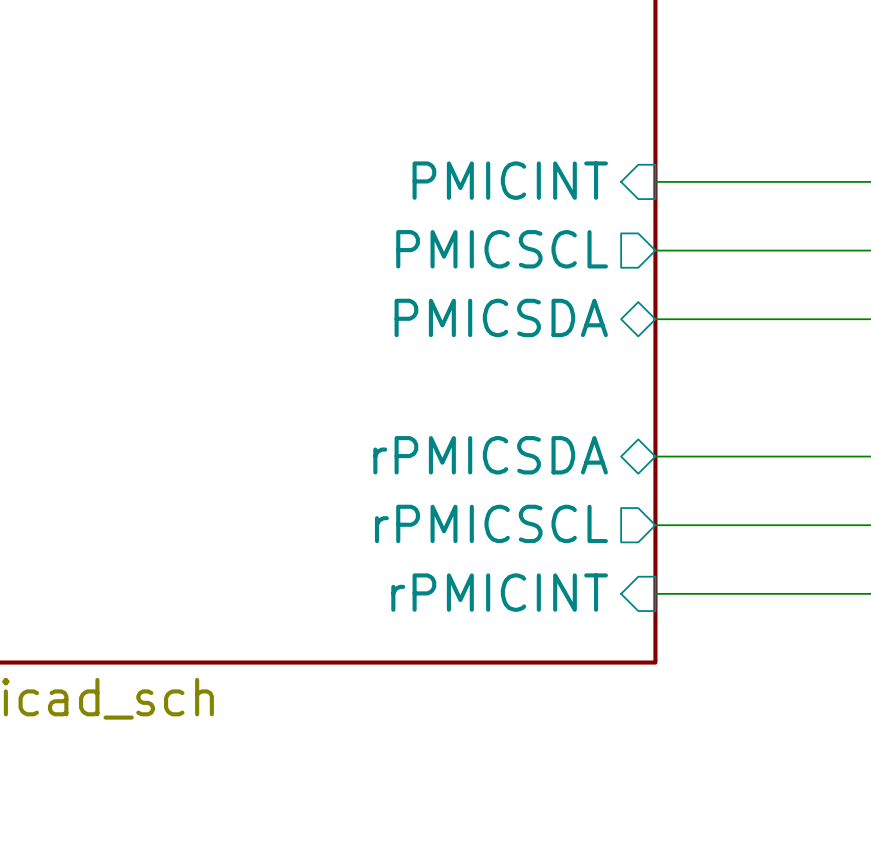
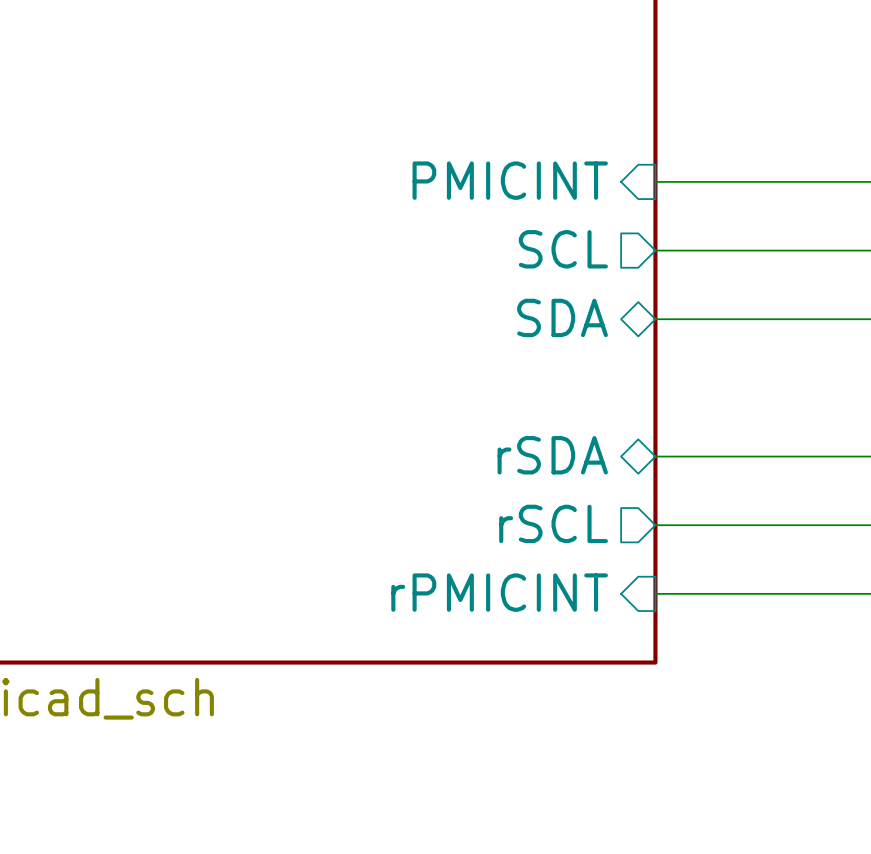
sheet pin: PMICSCL (502, 249) -> SCL (563, 249)
sheet pin: PMICSDA (501, 317) -> SDA (562, 317)
sheet pin: rPMICSDA (490, 455) -> rSDA (552, 455)
sheet pin: rPMICSCL (491, 523) -> rSCL (553, 523)

